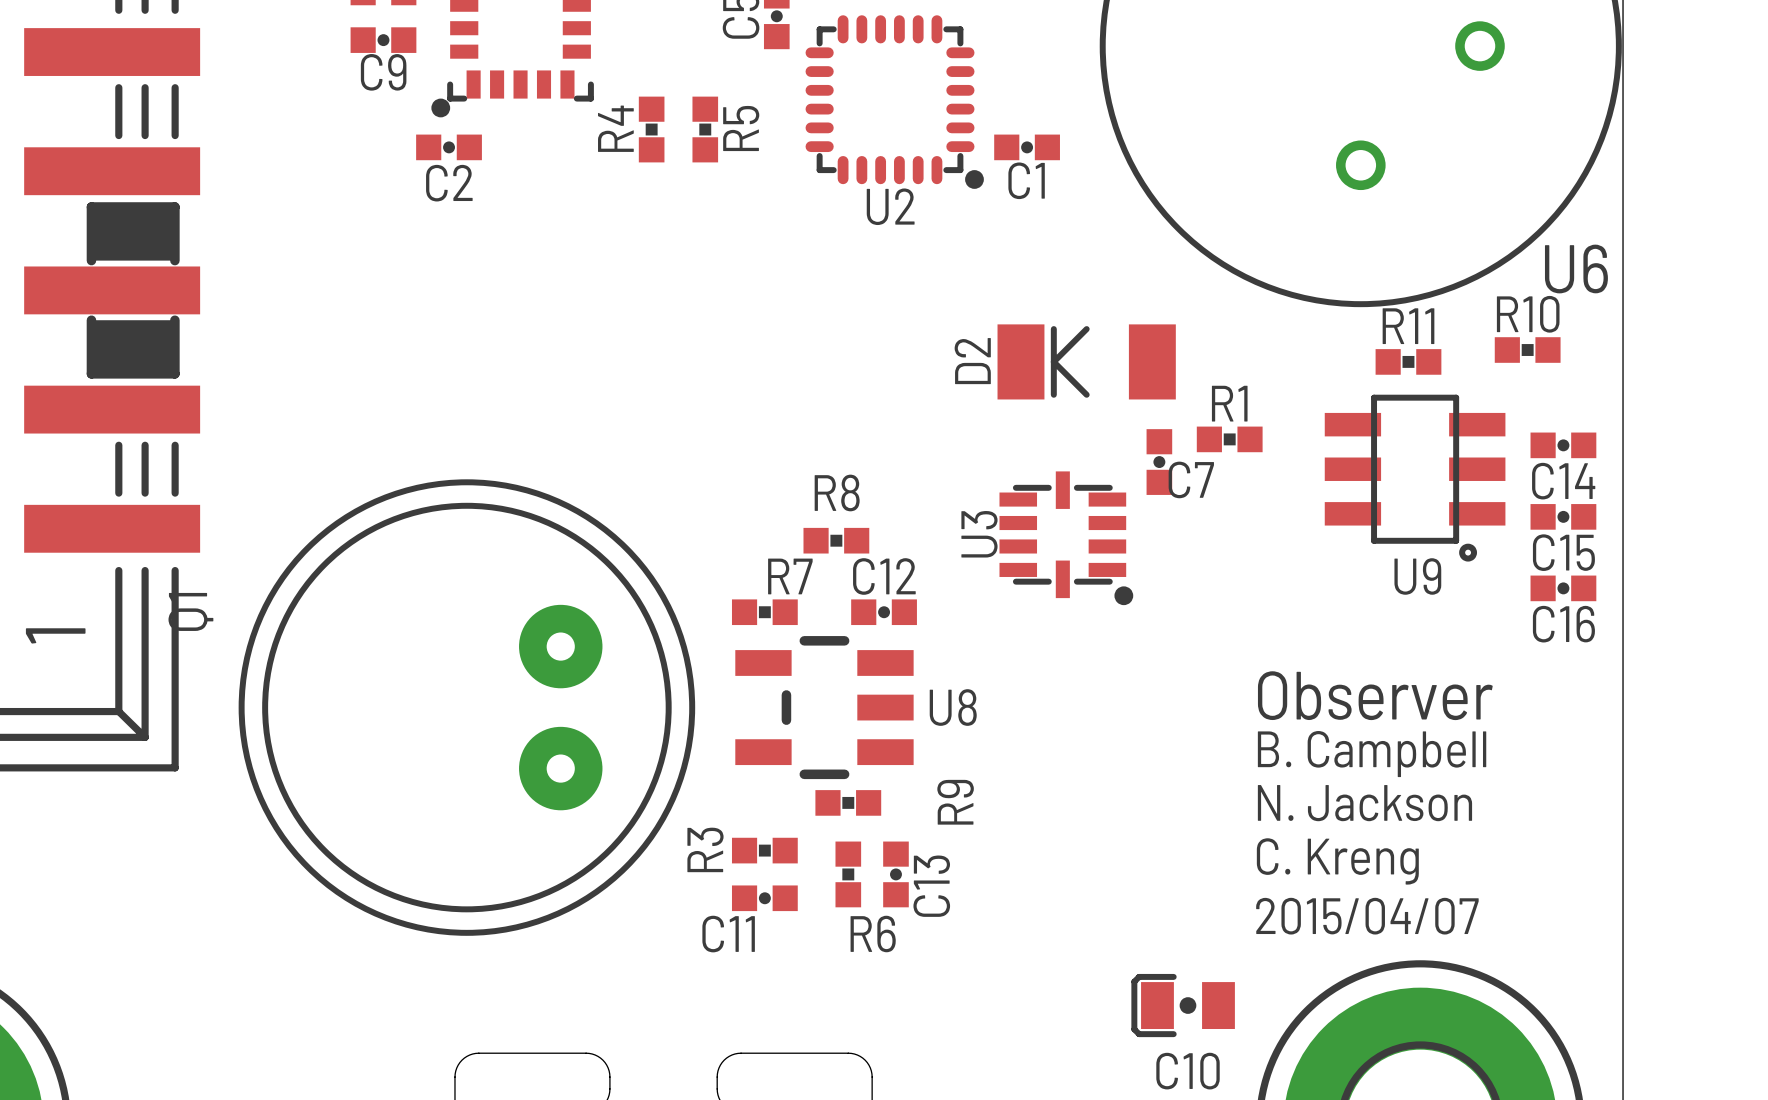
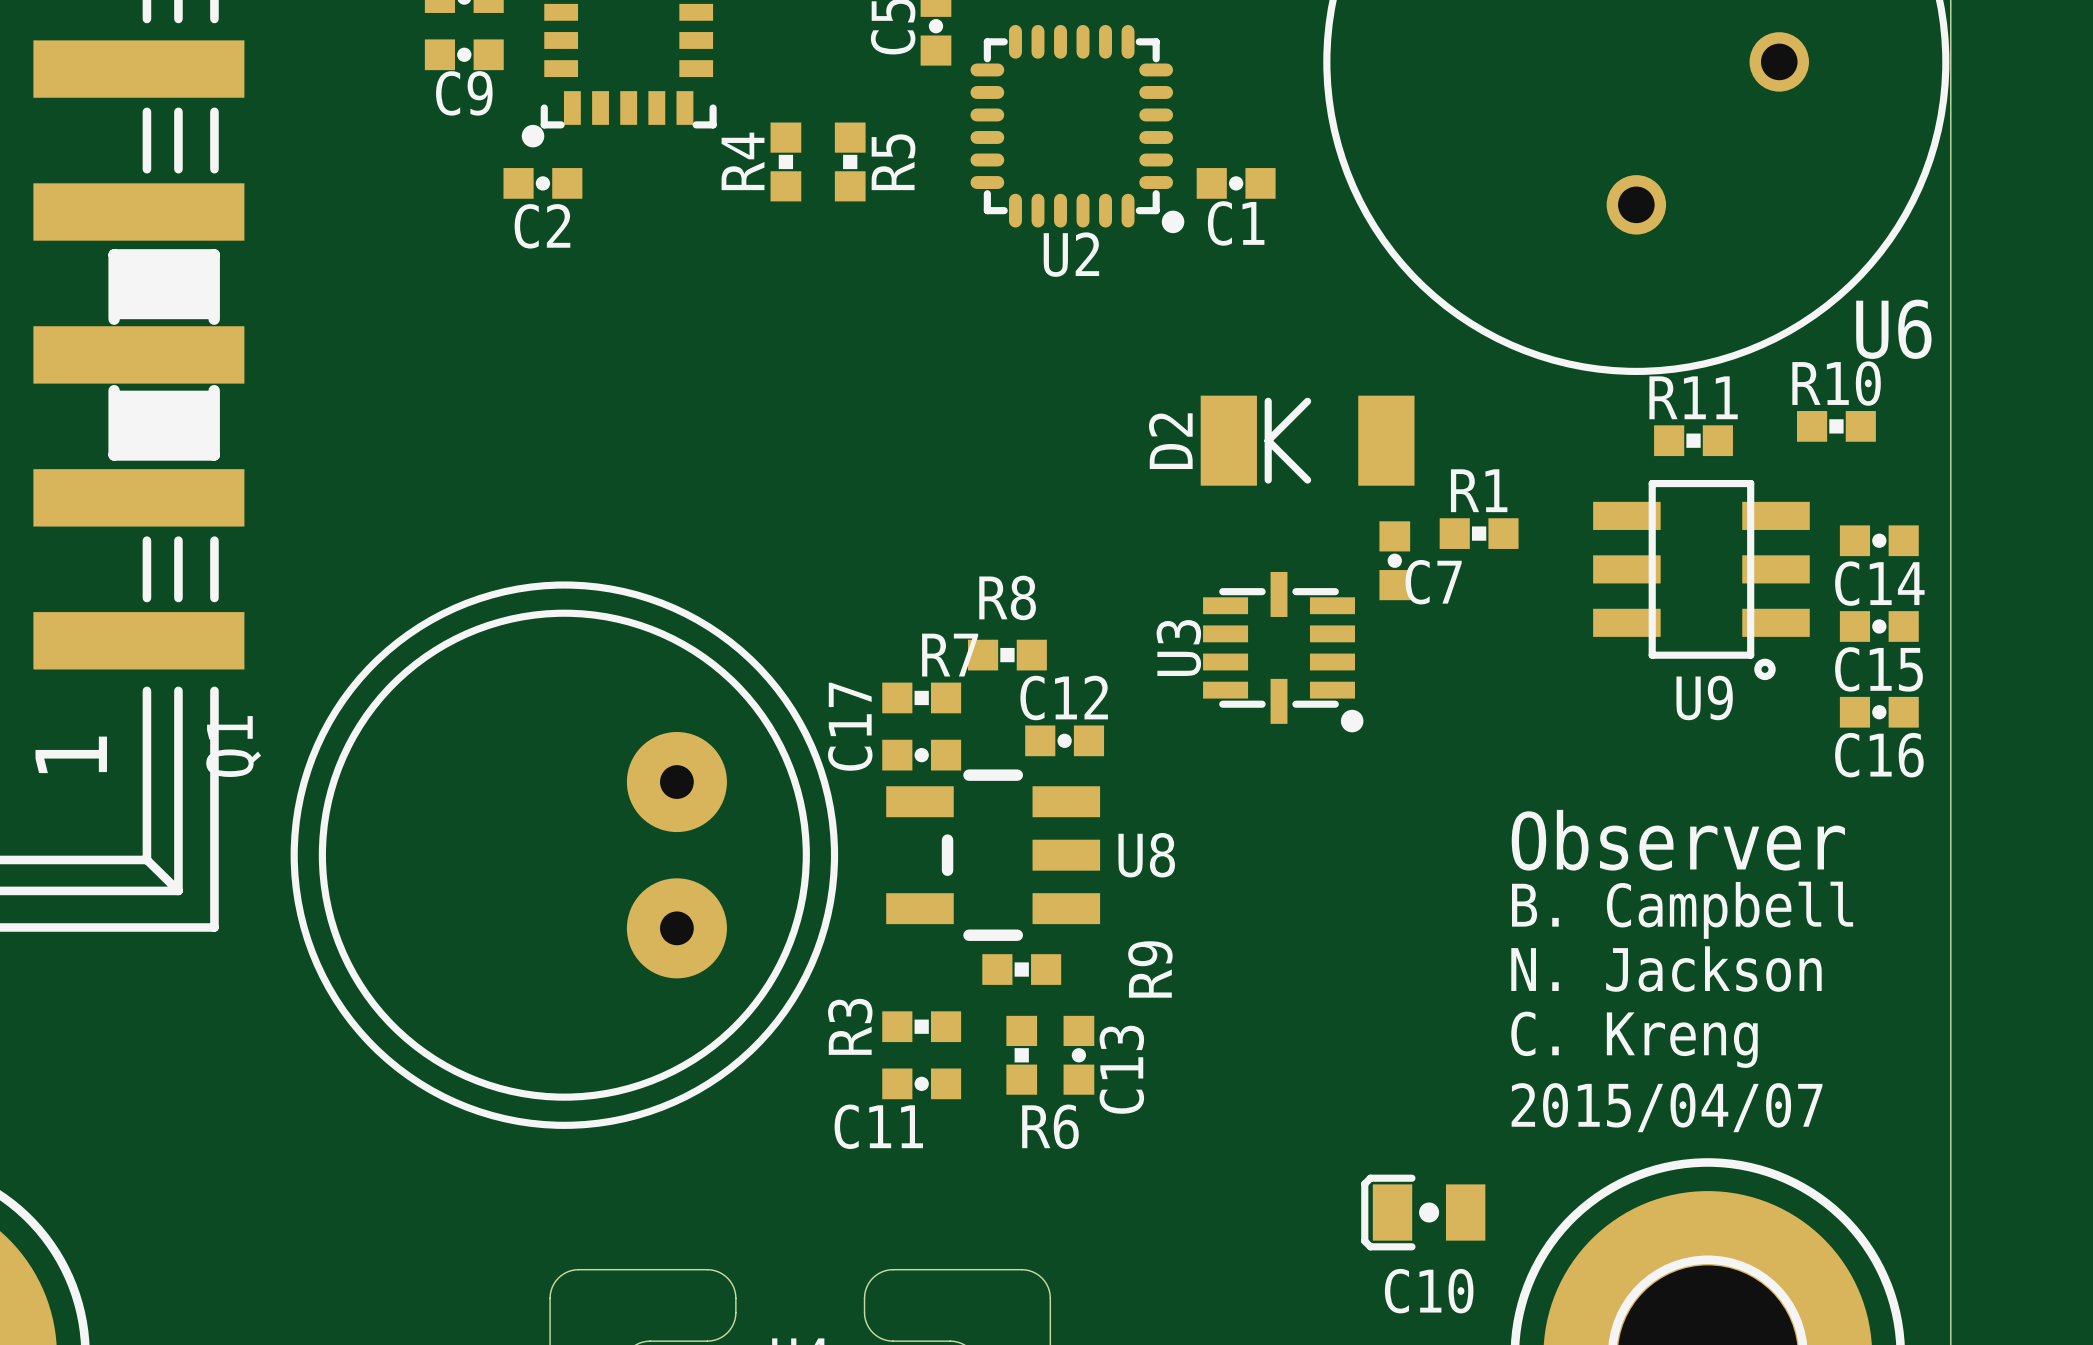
R7 position: (764, 612) -> (921, 697)
C17: none -> (921, 755)

